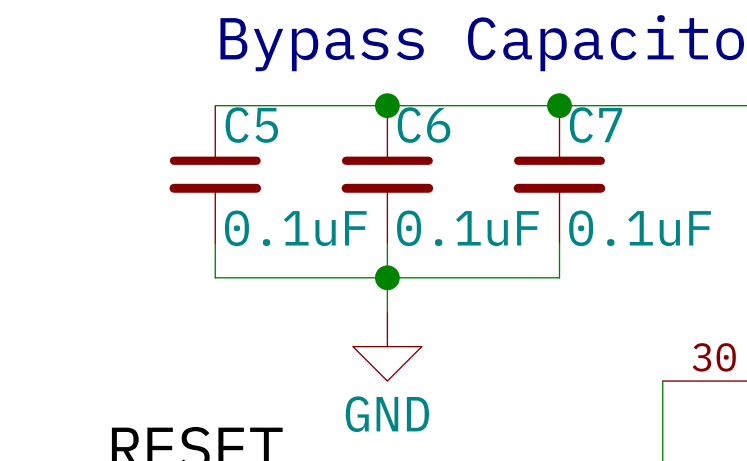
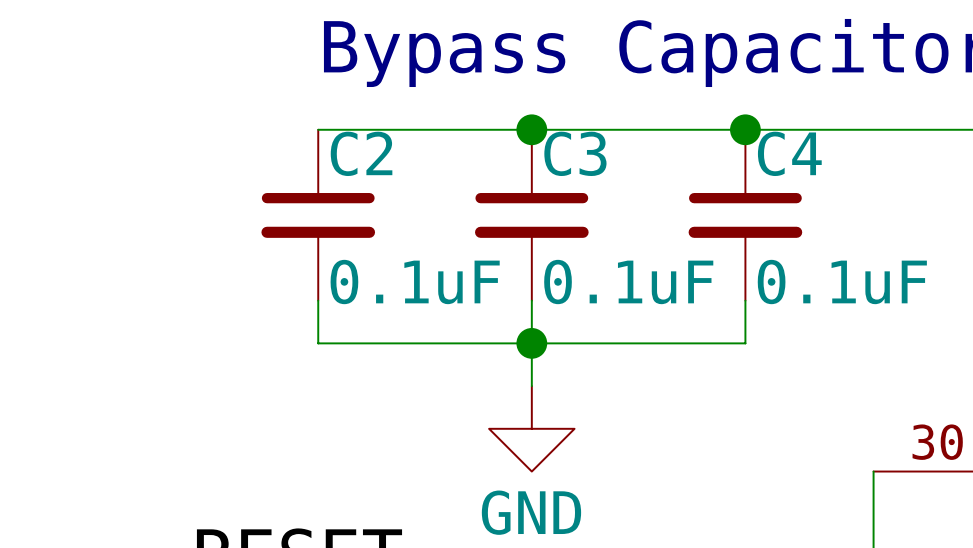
C5 name: C5 (251, 125) -> C2 (361, 153)
C6 name: C6 (424, 125) -> C3 (575, 153)
C7 name: C7 (595, 125) -> C4 (789, 153)

